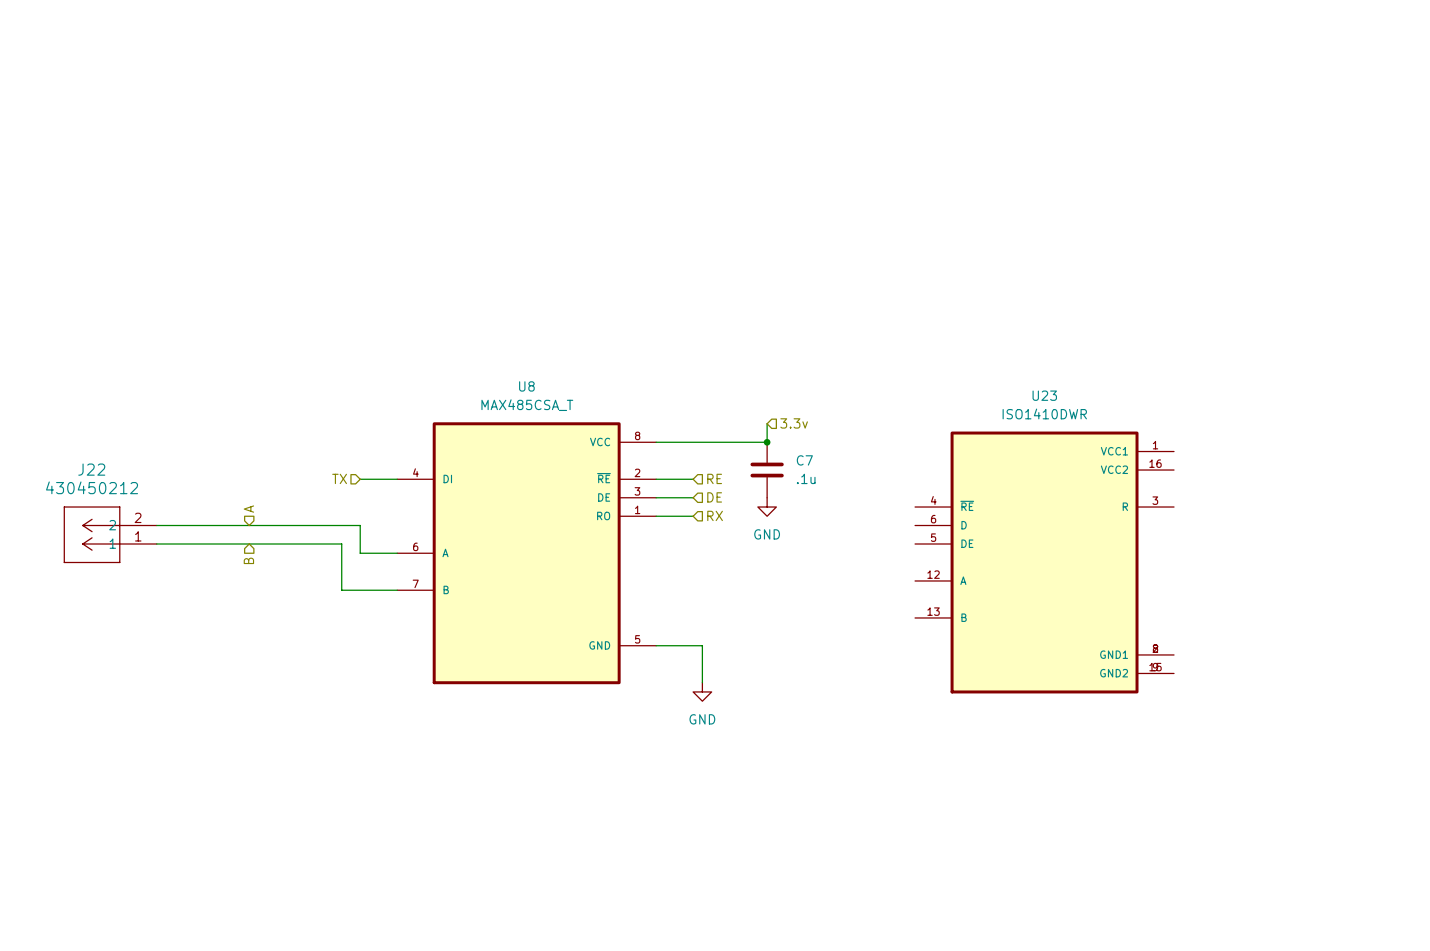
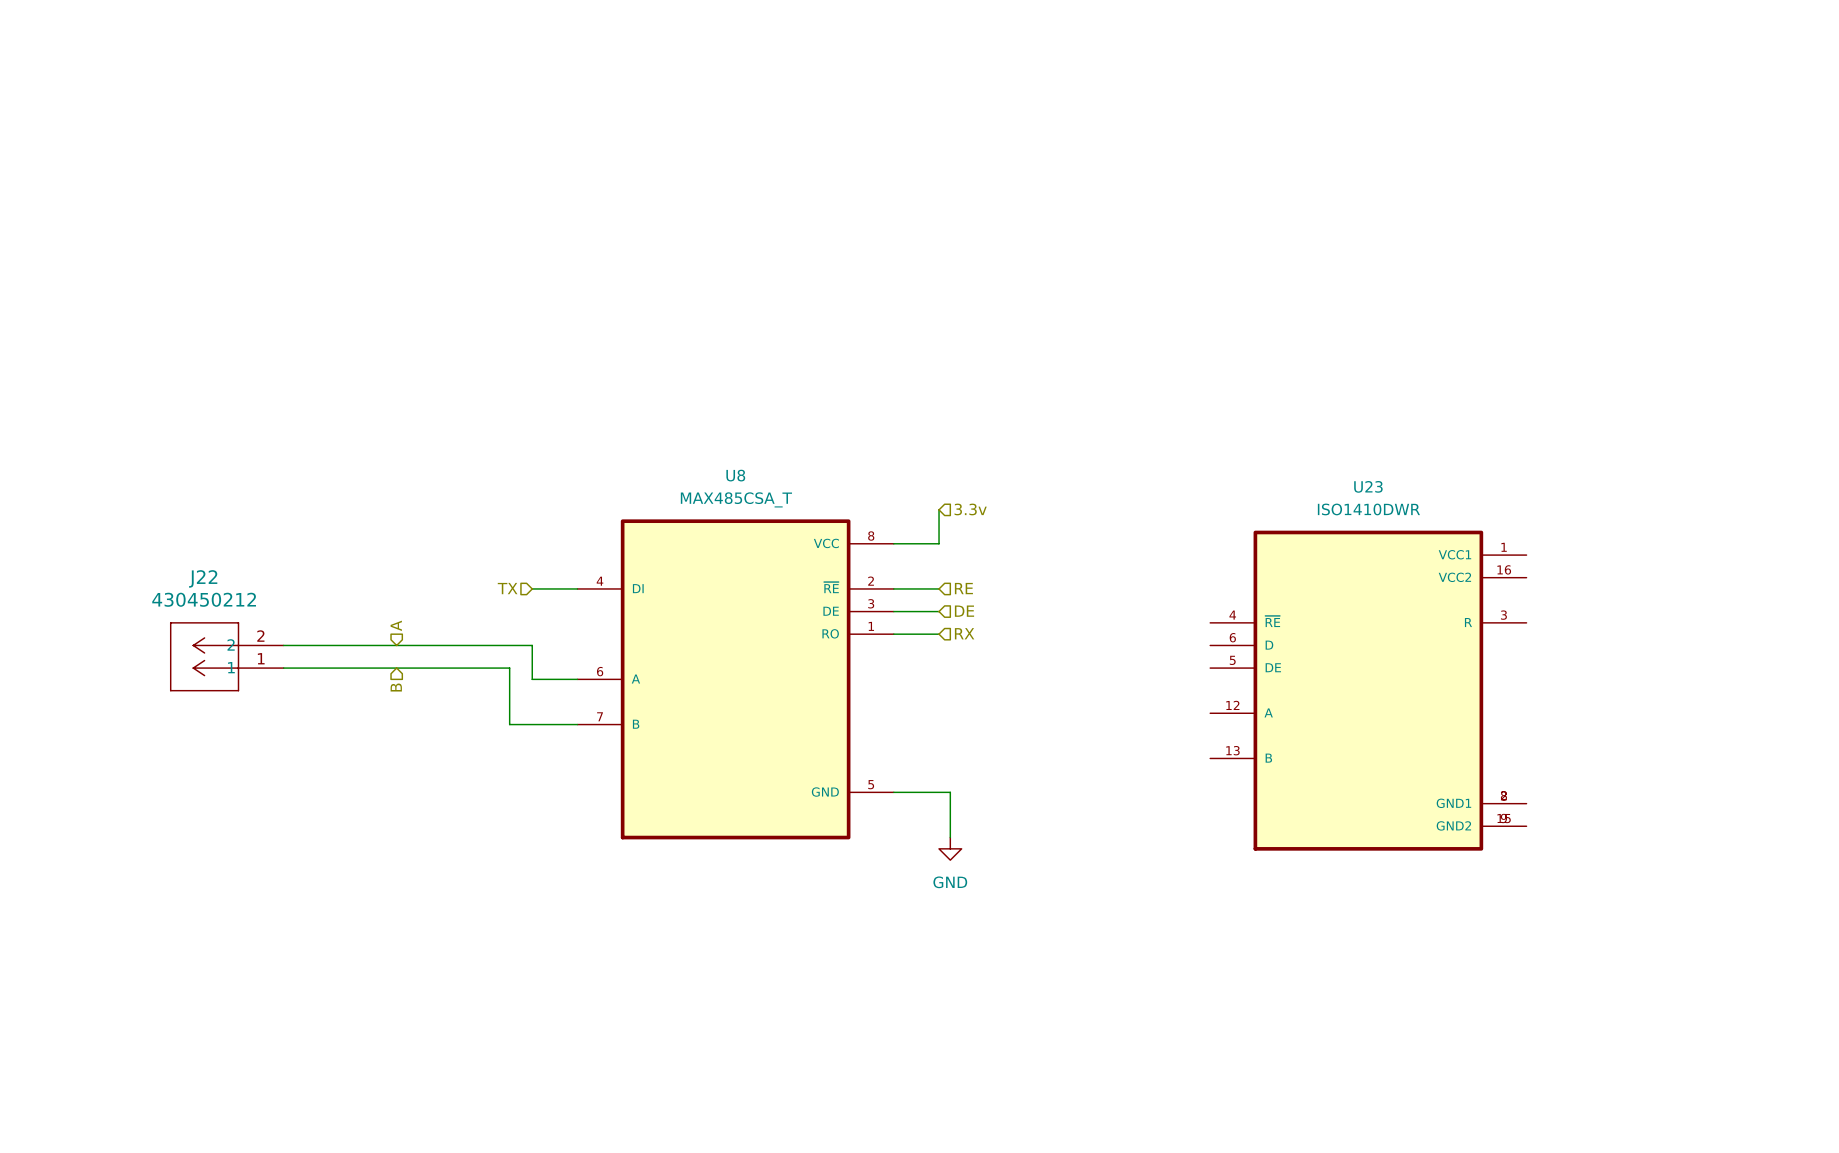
wire: (767, 423) (767, 442) (693, 442) -> (939, 509) (939, 543)
hierarchical label position: 3.3v (794, 423) -> 3.3v (970, 509)
junction: (767, 442) -> none
C7: .1u (767, 470) -> none
power symbol: GND (767, 507) -> none

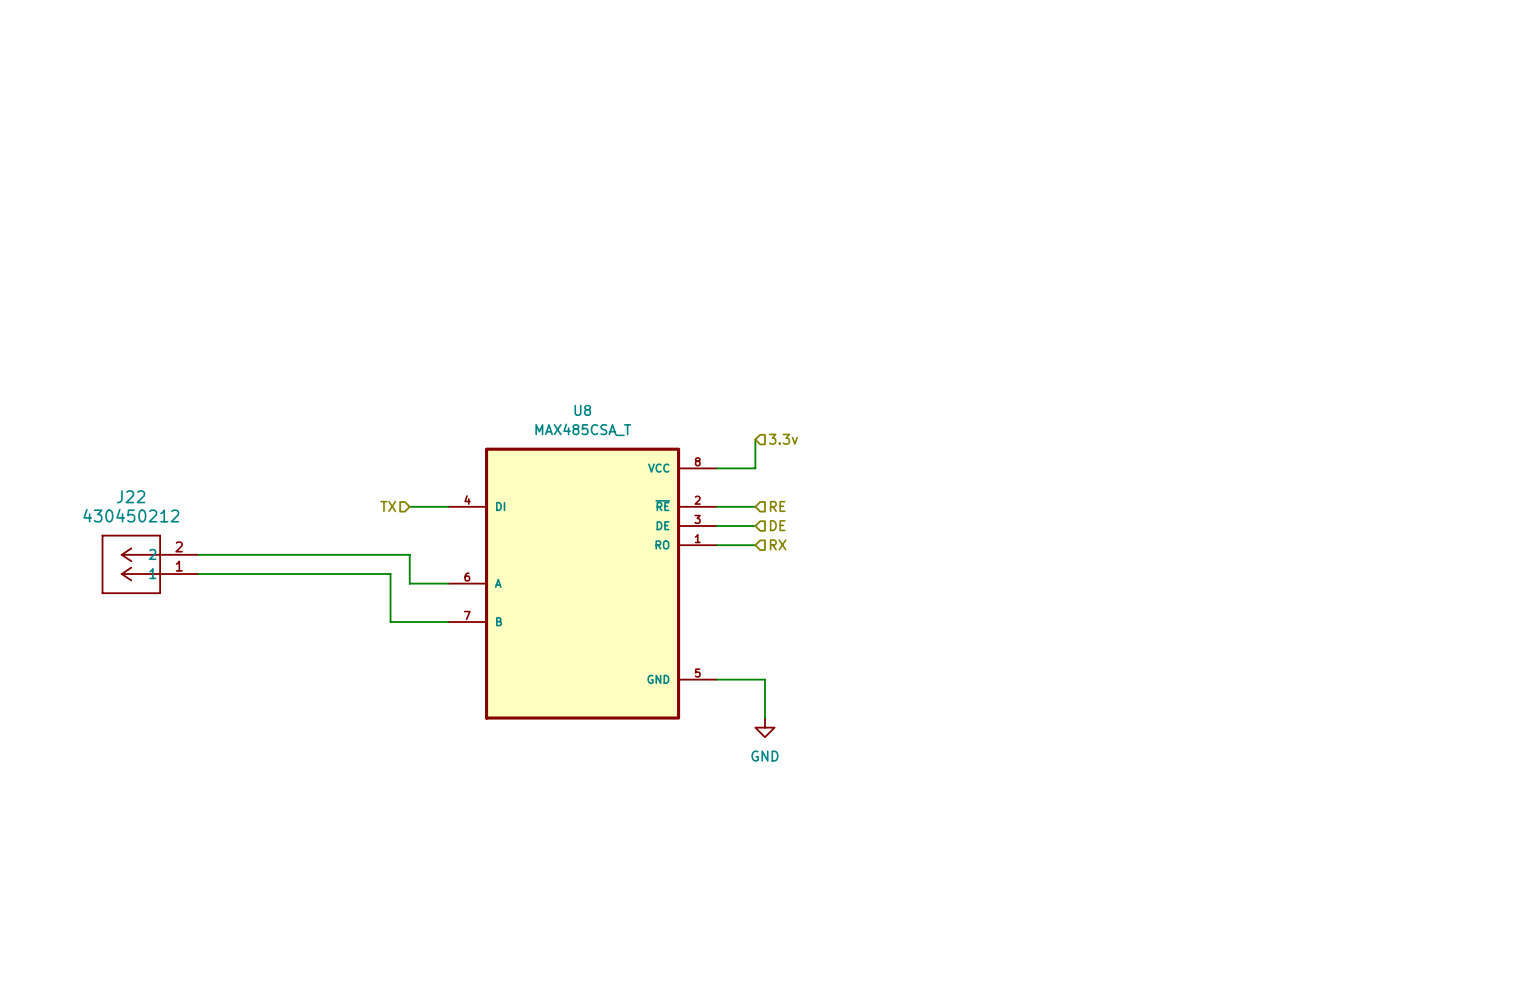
hierarchical label: A (396, 625) -> none
hierarchical label: B (396, 687) -> none
U23: ISO1410DWR (1368, 690) -> none

